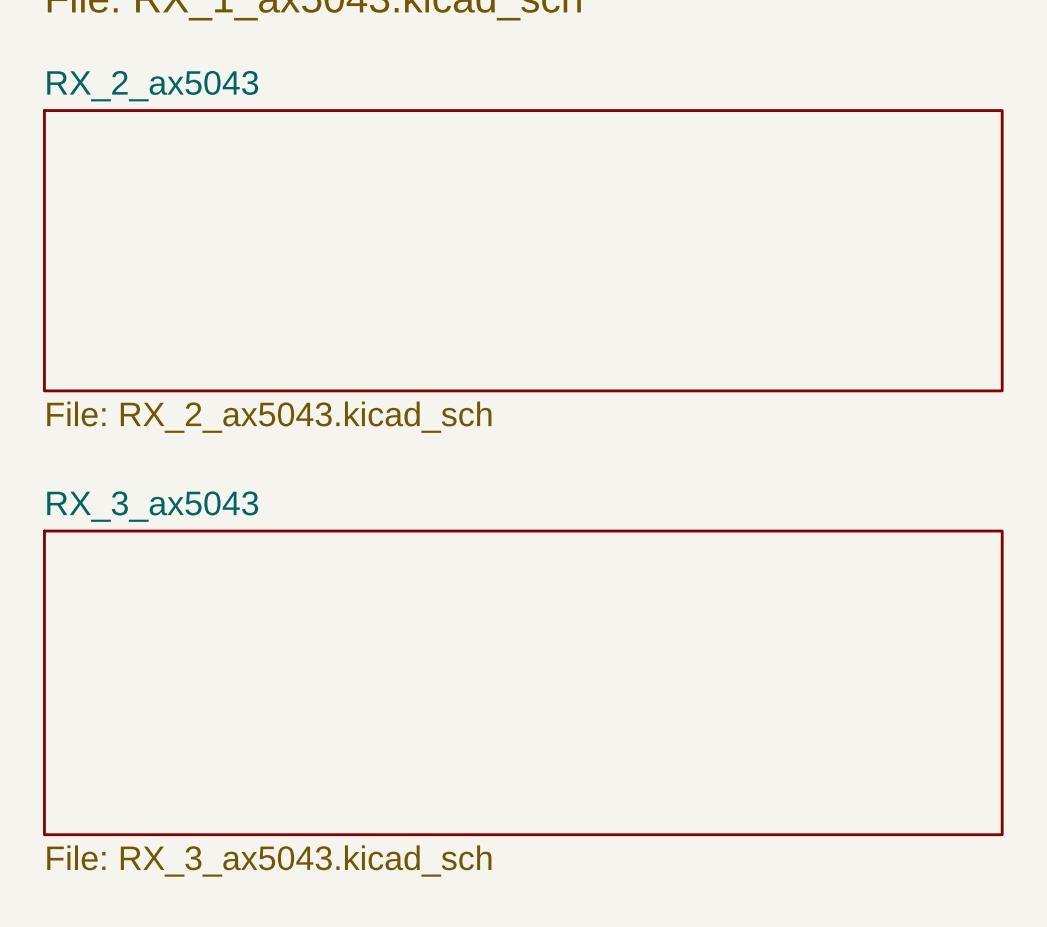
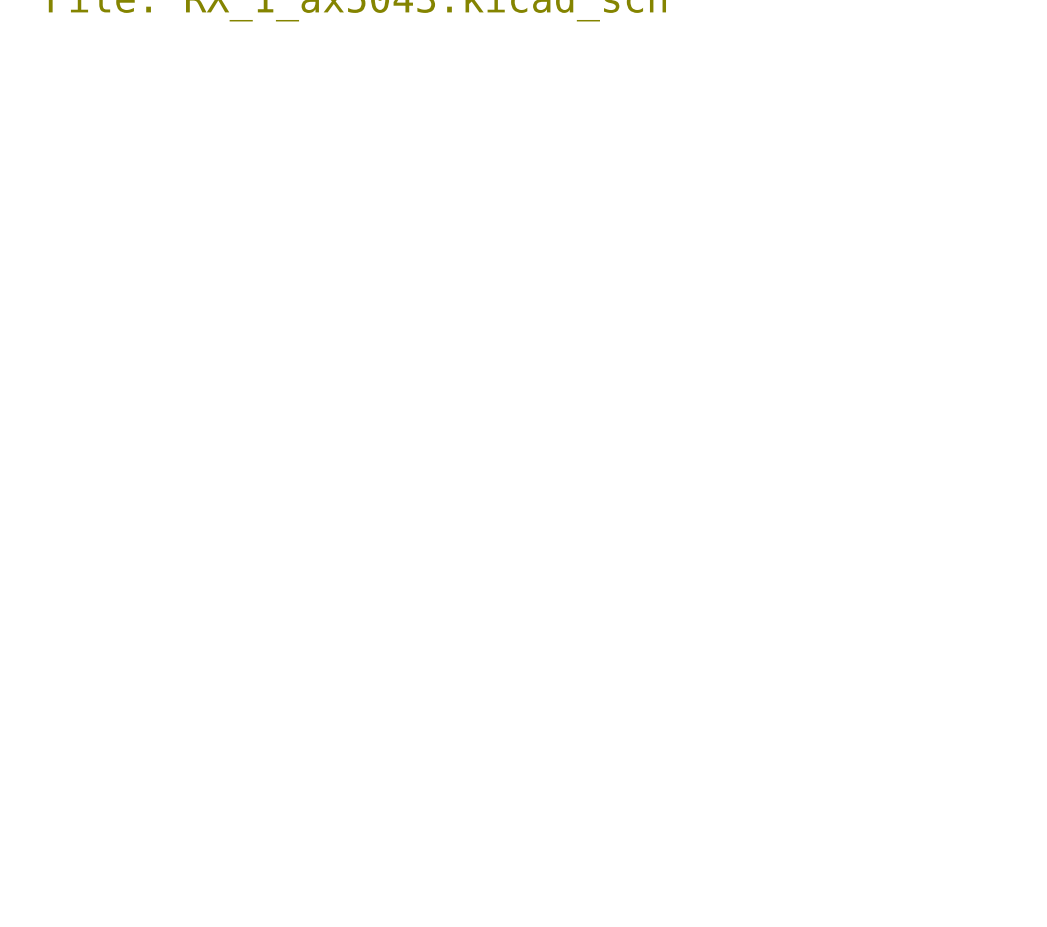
sheet RX_2_ax5043: File: RX_2_ax5043.kicad_sch (523, 250) -> none
sheet RX_3_ax5043: File: RX_3_ax5043.kicad_sch (523, 682) -> none

